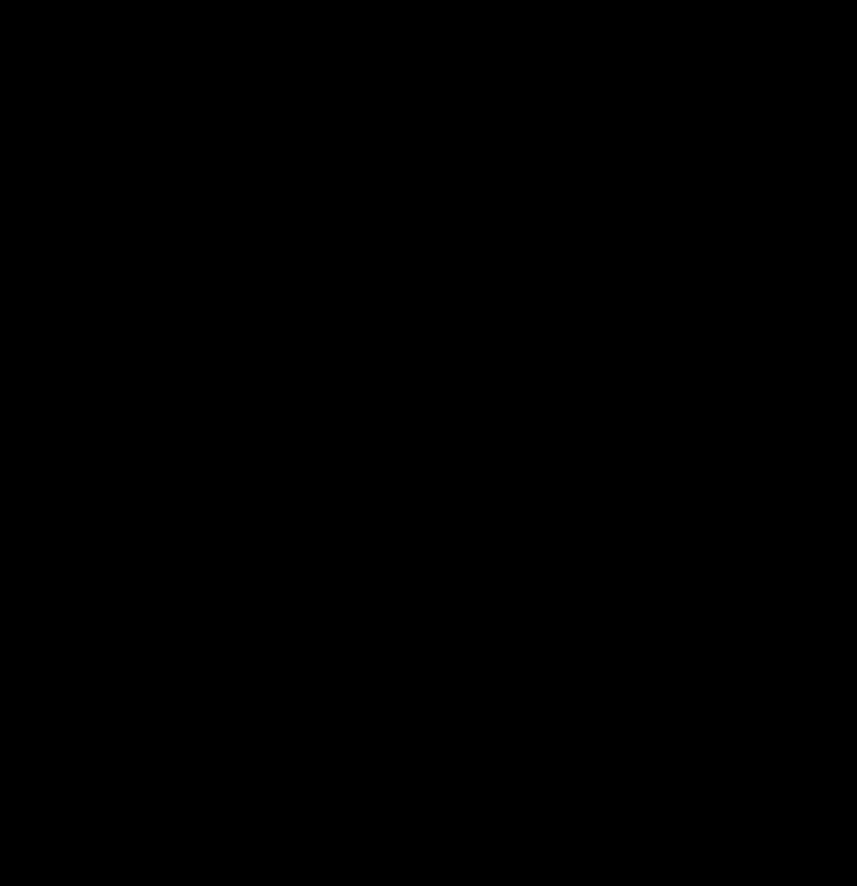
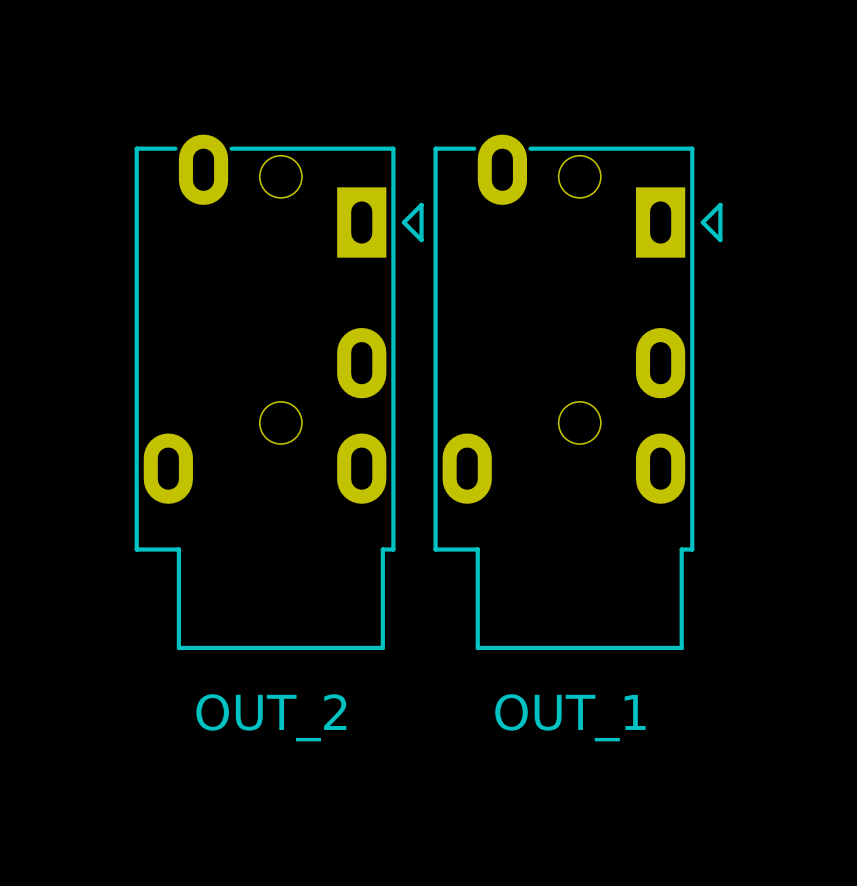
OUT_2: none -> (279, 392)
OUT_1: none -> (577, 392)

